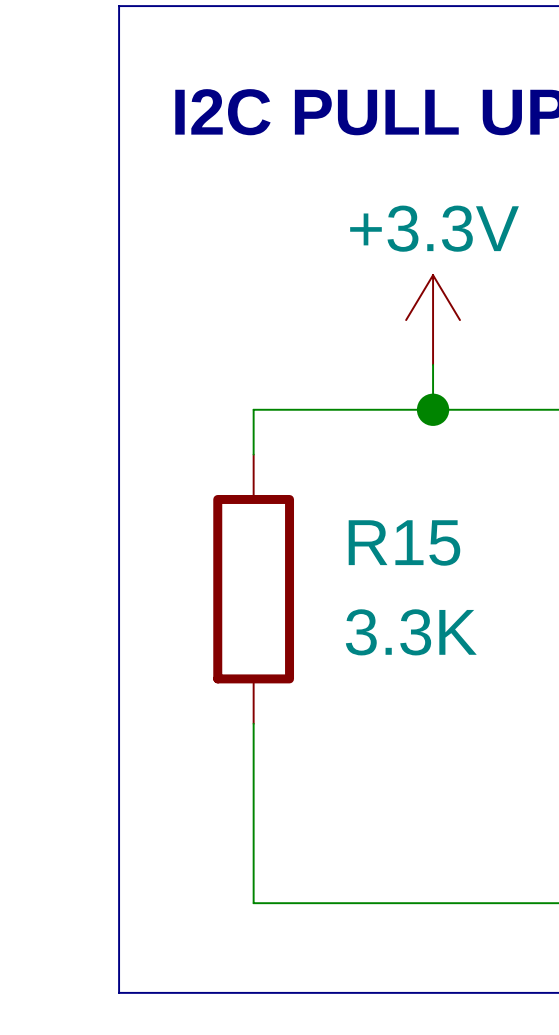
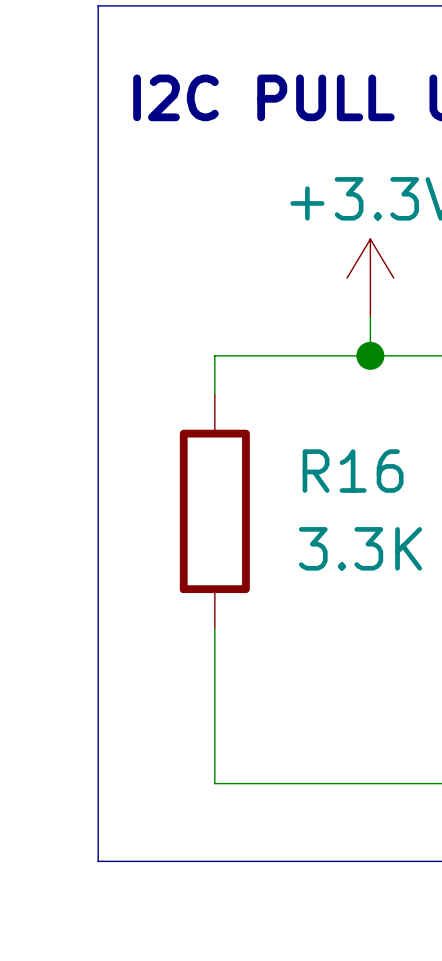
R15 name: R15 (404, 542) -> R16 (353, 471)

